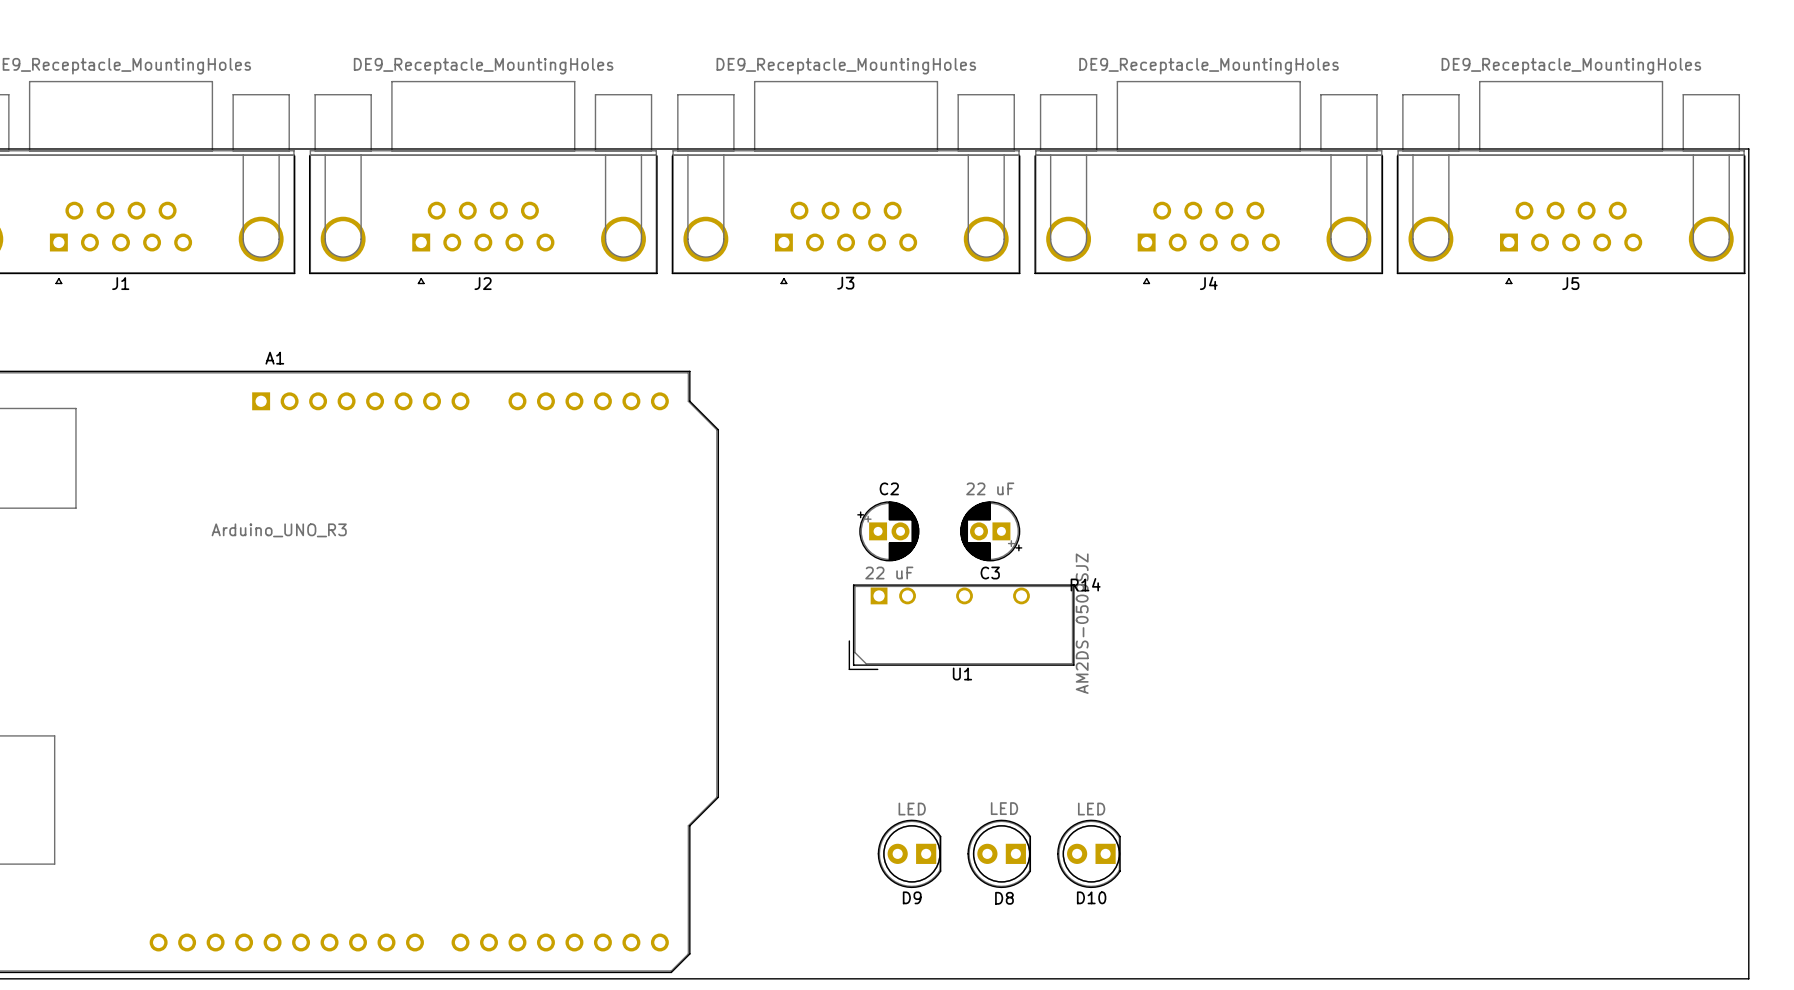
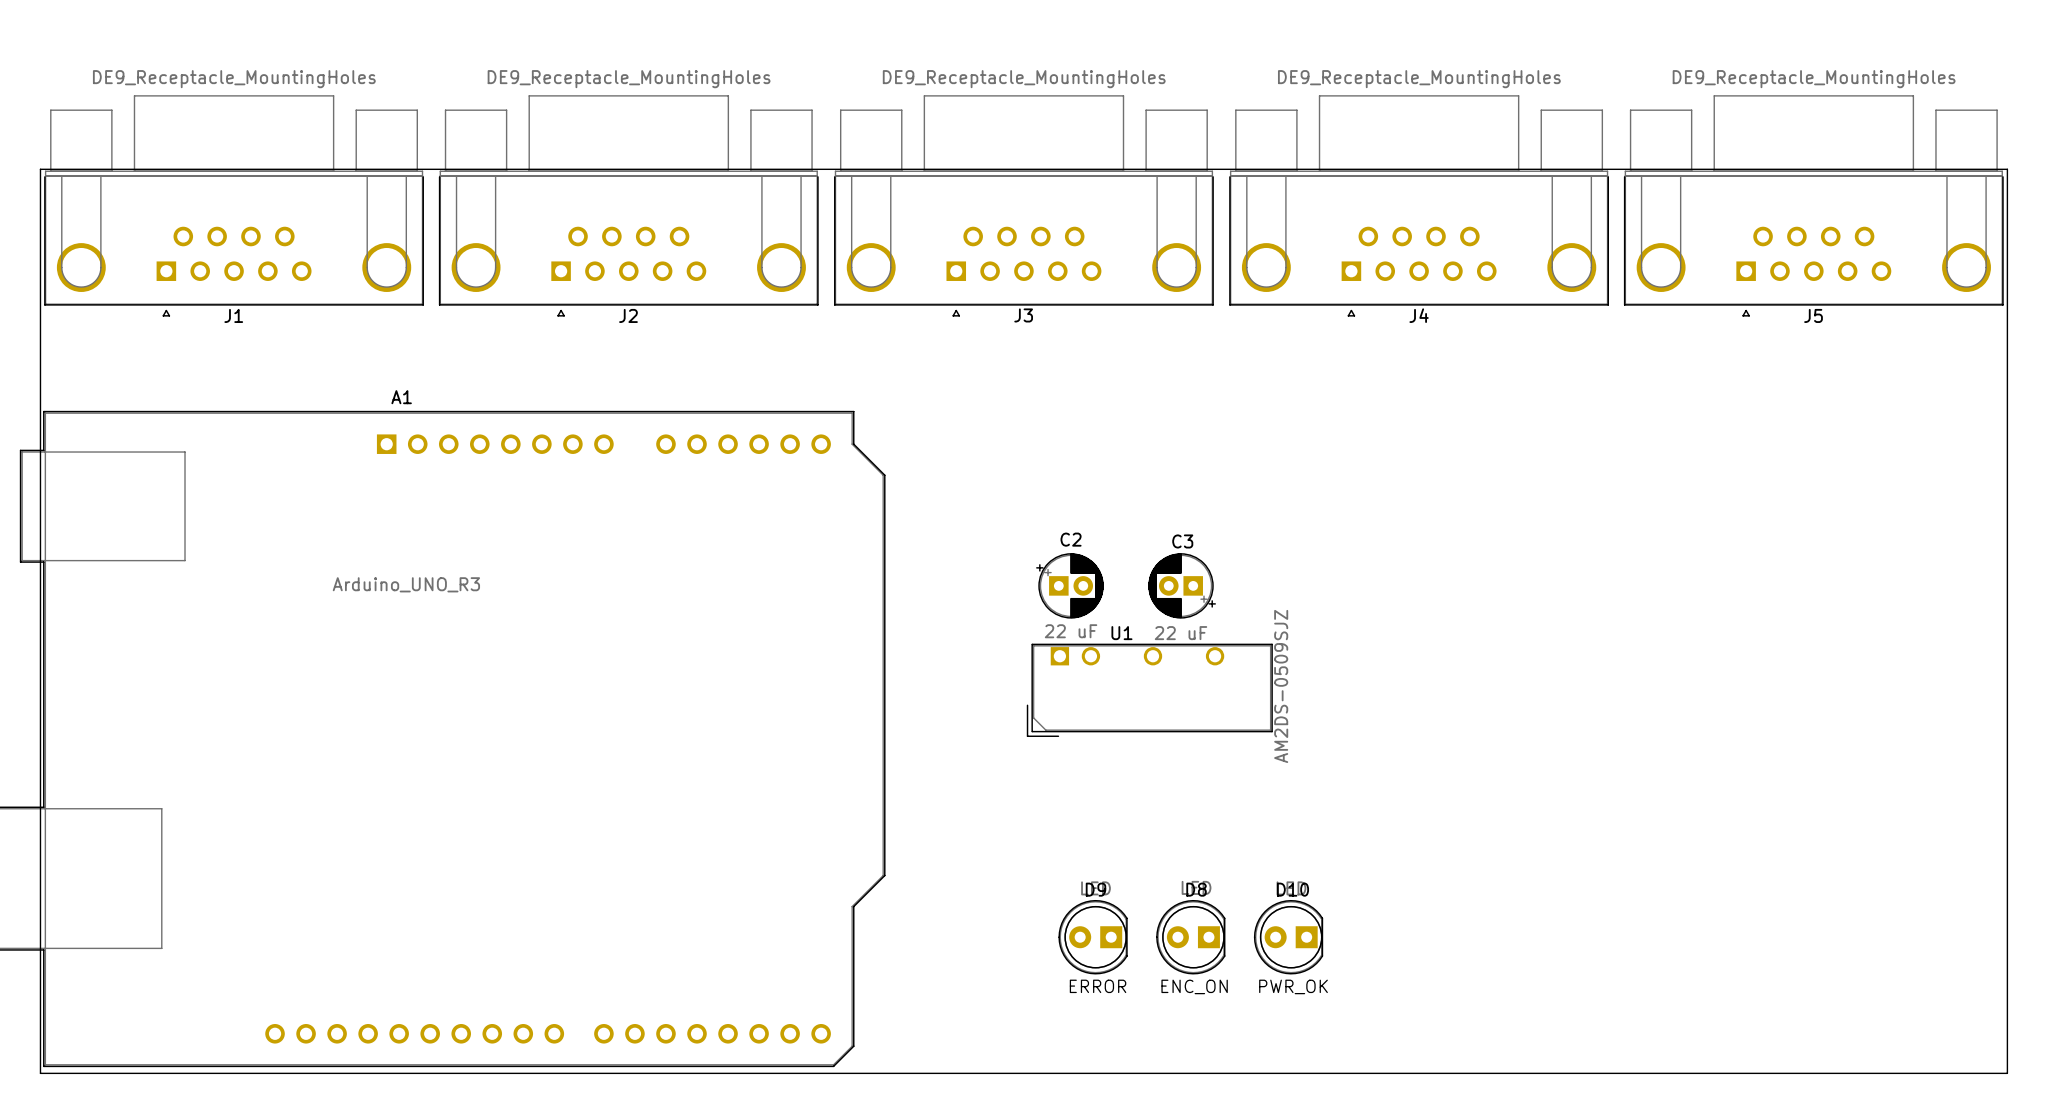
C3 value position: 22 uF (990, 488) -> 22 uF (1180, 633)
C3 name position: C3 (990, 573) -> C3 (1182, 541)
R14: (1085, 584) -> none
U1 name position: U1 (962, 674) -> U1 (1121, 633)
D9 name position: D9 (912, 897) -> D9 (1095, 889)
D10 name position: D10 (1091, 897) -> D10 (1292, 889)
text: none -> ERROR (1098, 986)
D8 name position: D8 (1004, 898) -> D8 (1196, 889)
text: none -> ENC_ON (1194, 986)
text: none -> PWR_OK (1293, 986)

